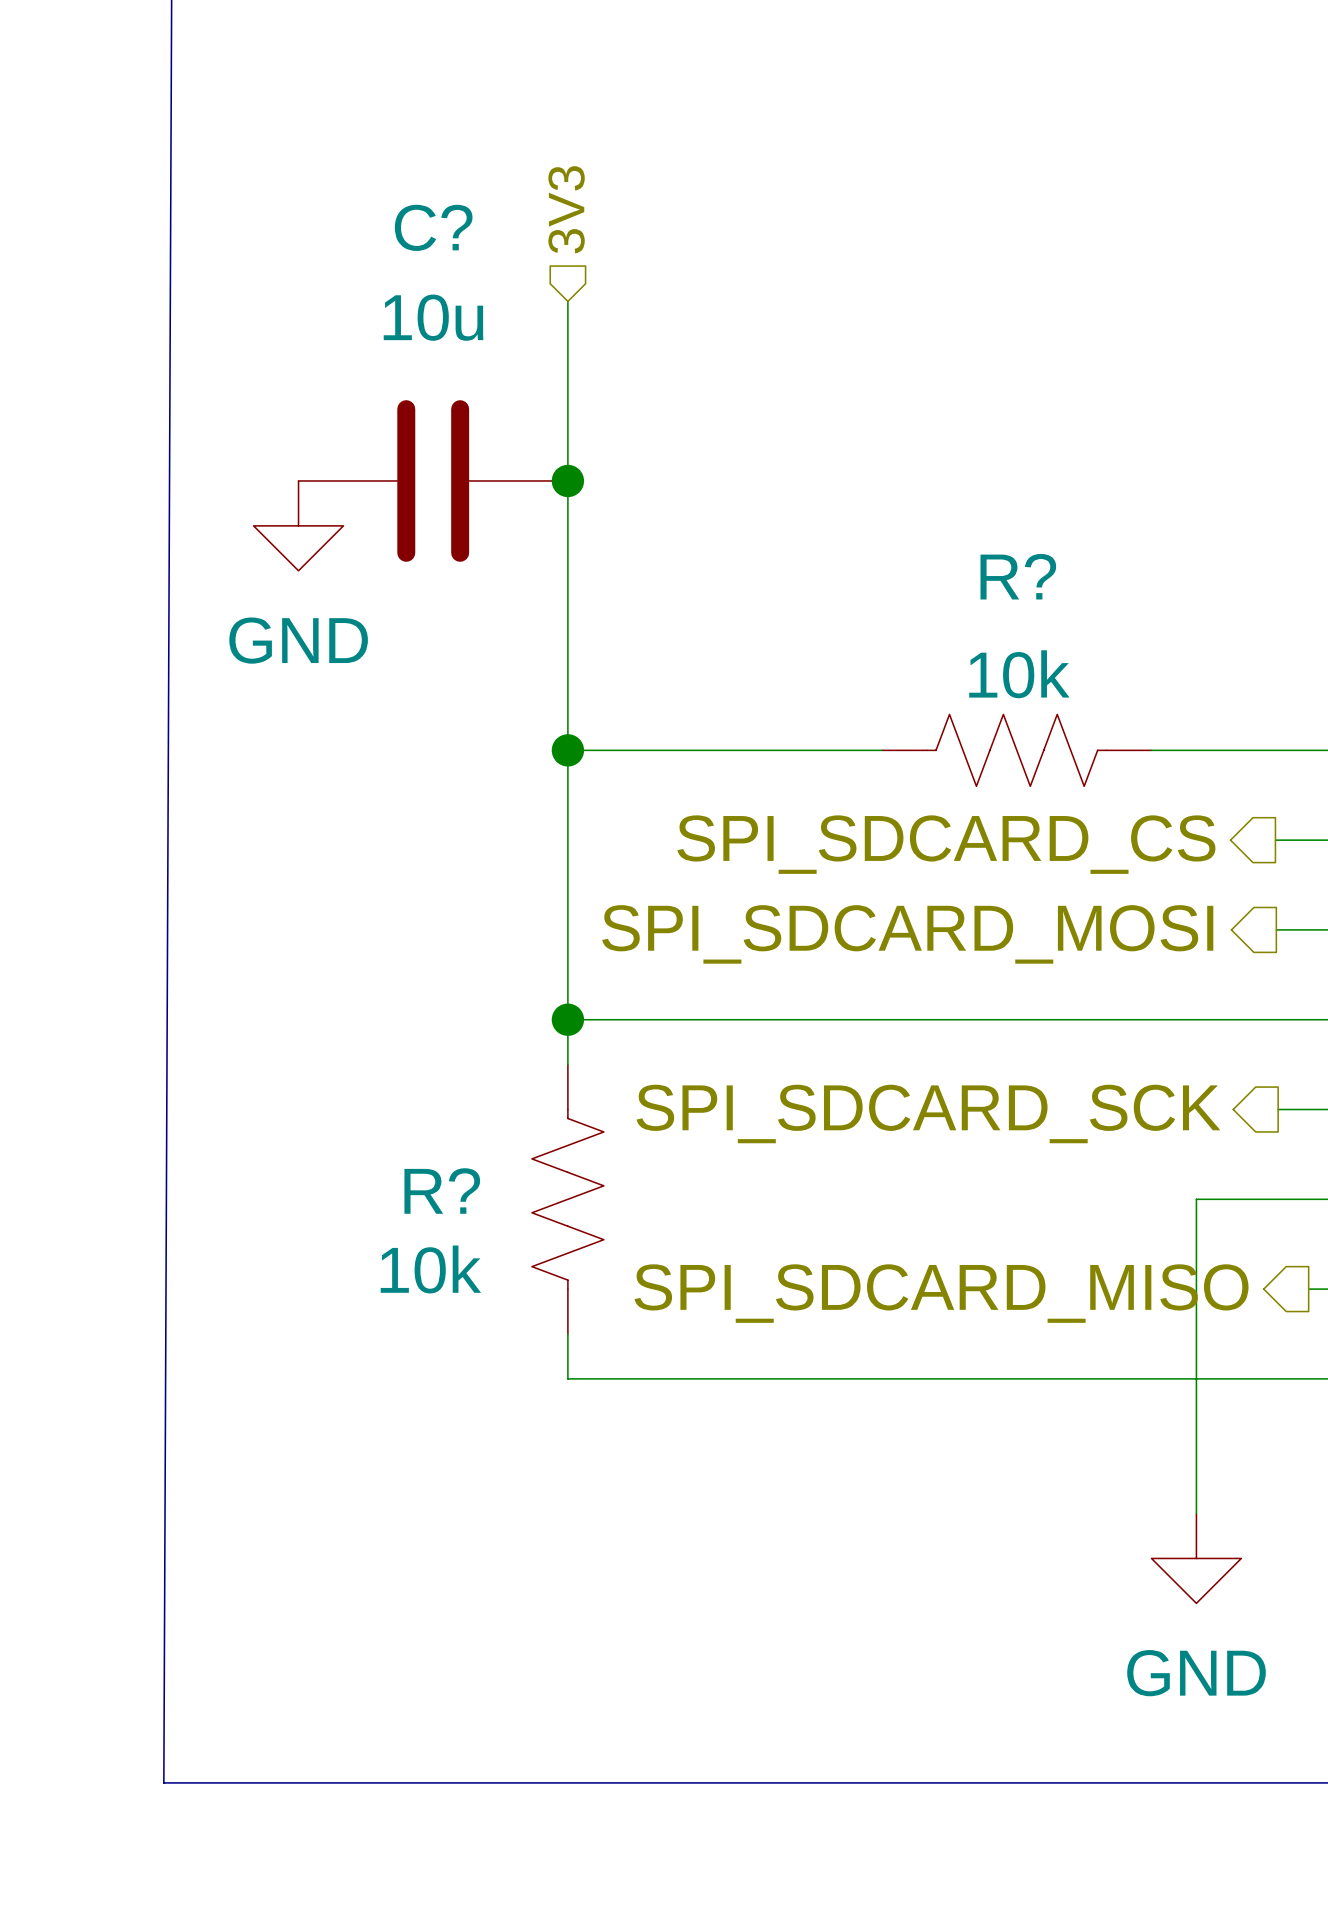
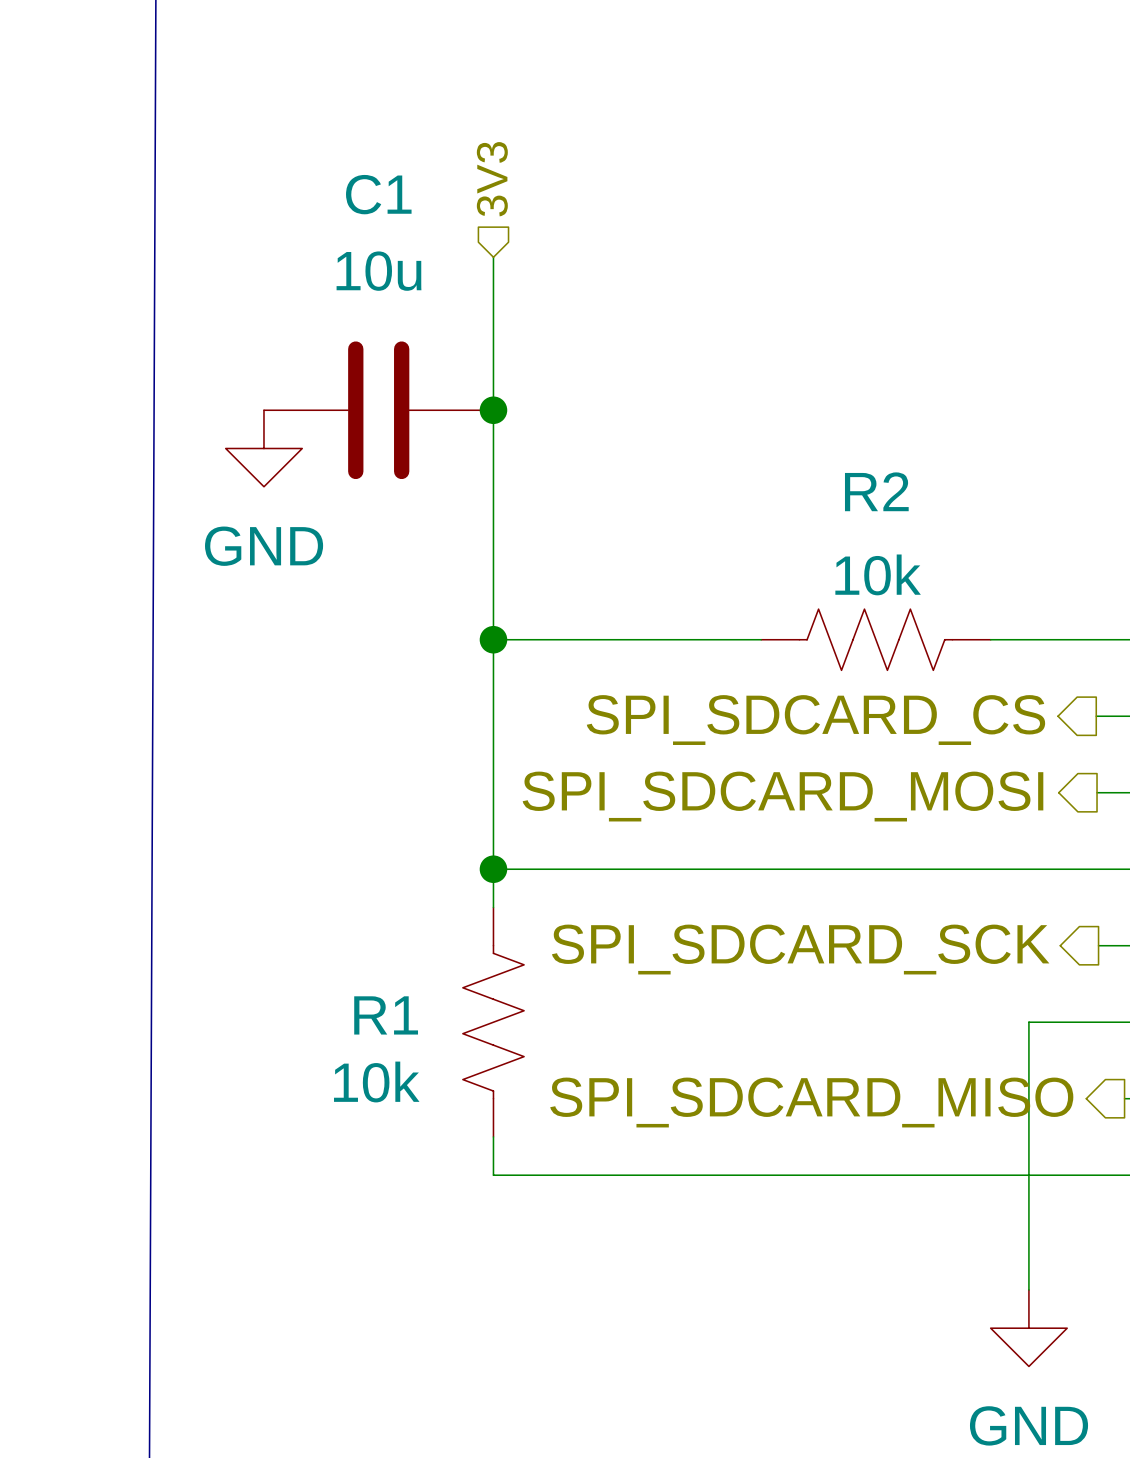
C? name: C? (433, 227) -> C1 (378, 194)
R? name: R? (1018, 576) -> R2 (876, 491)
R? name: R? (442, 1191) -> R1 (386, 1015)

